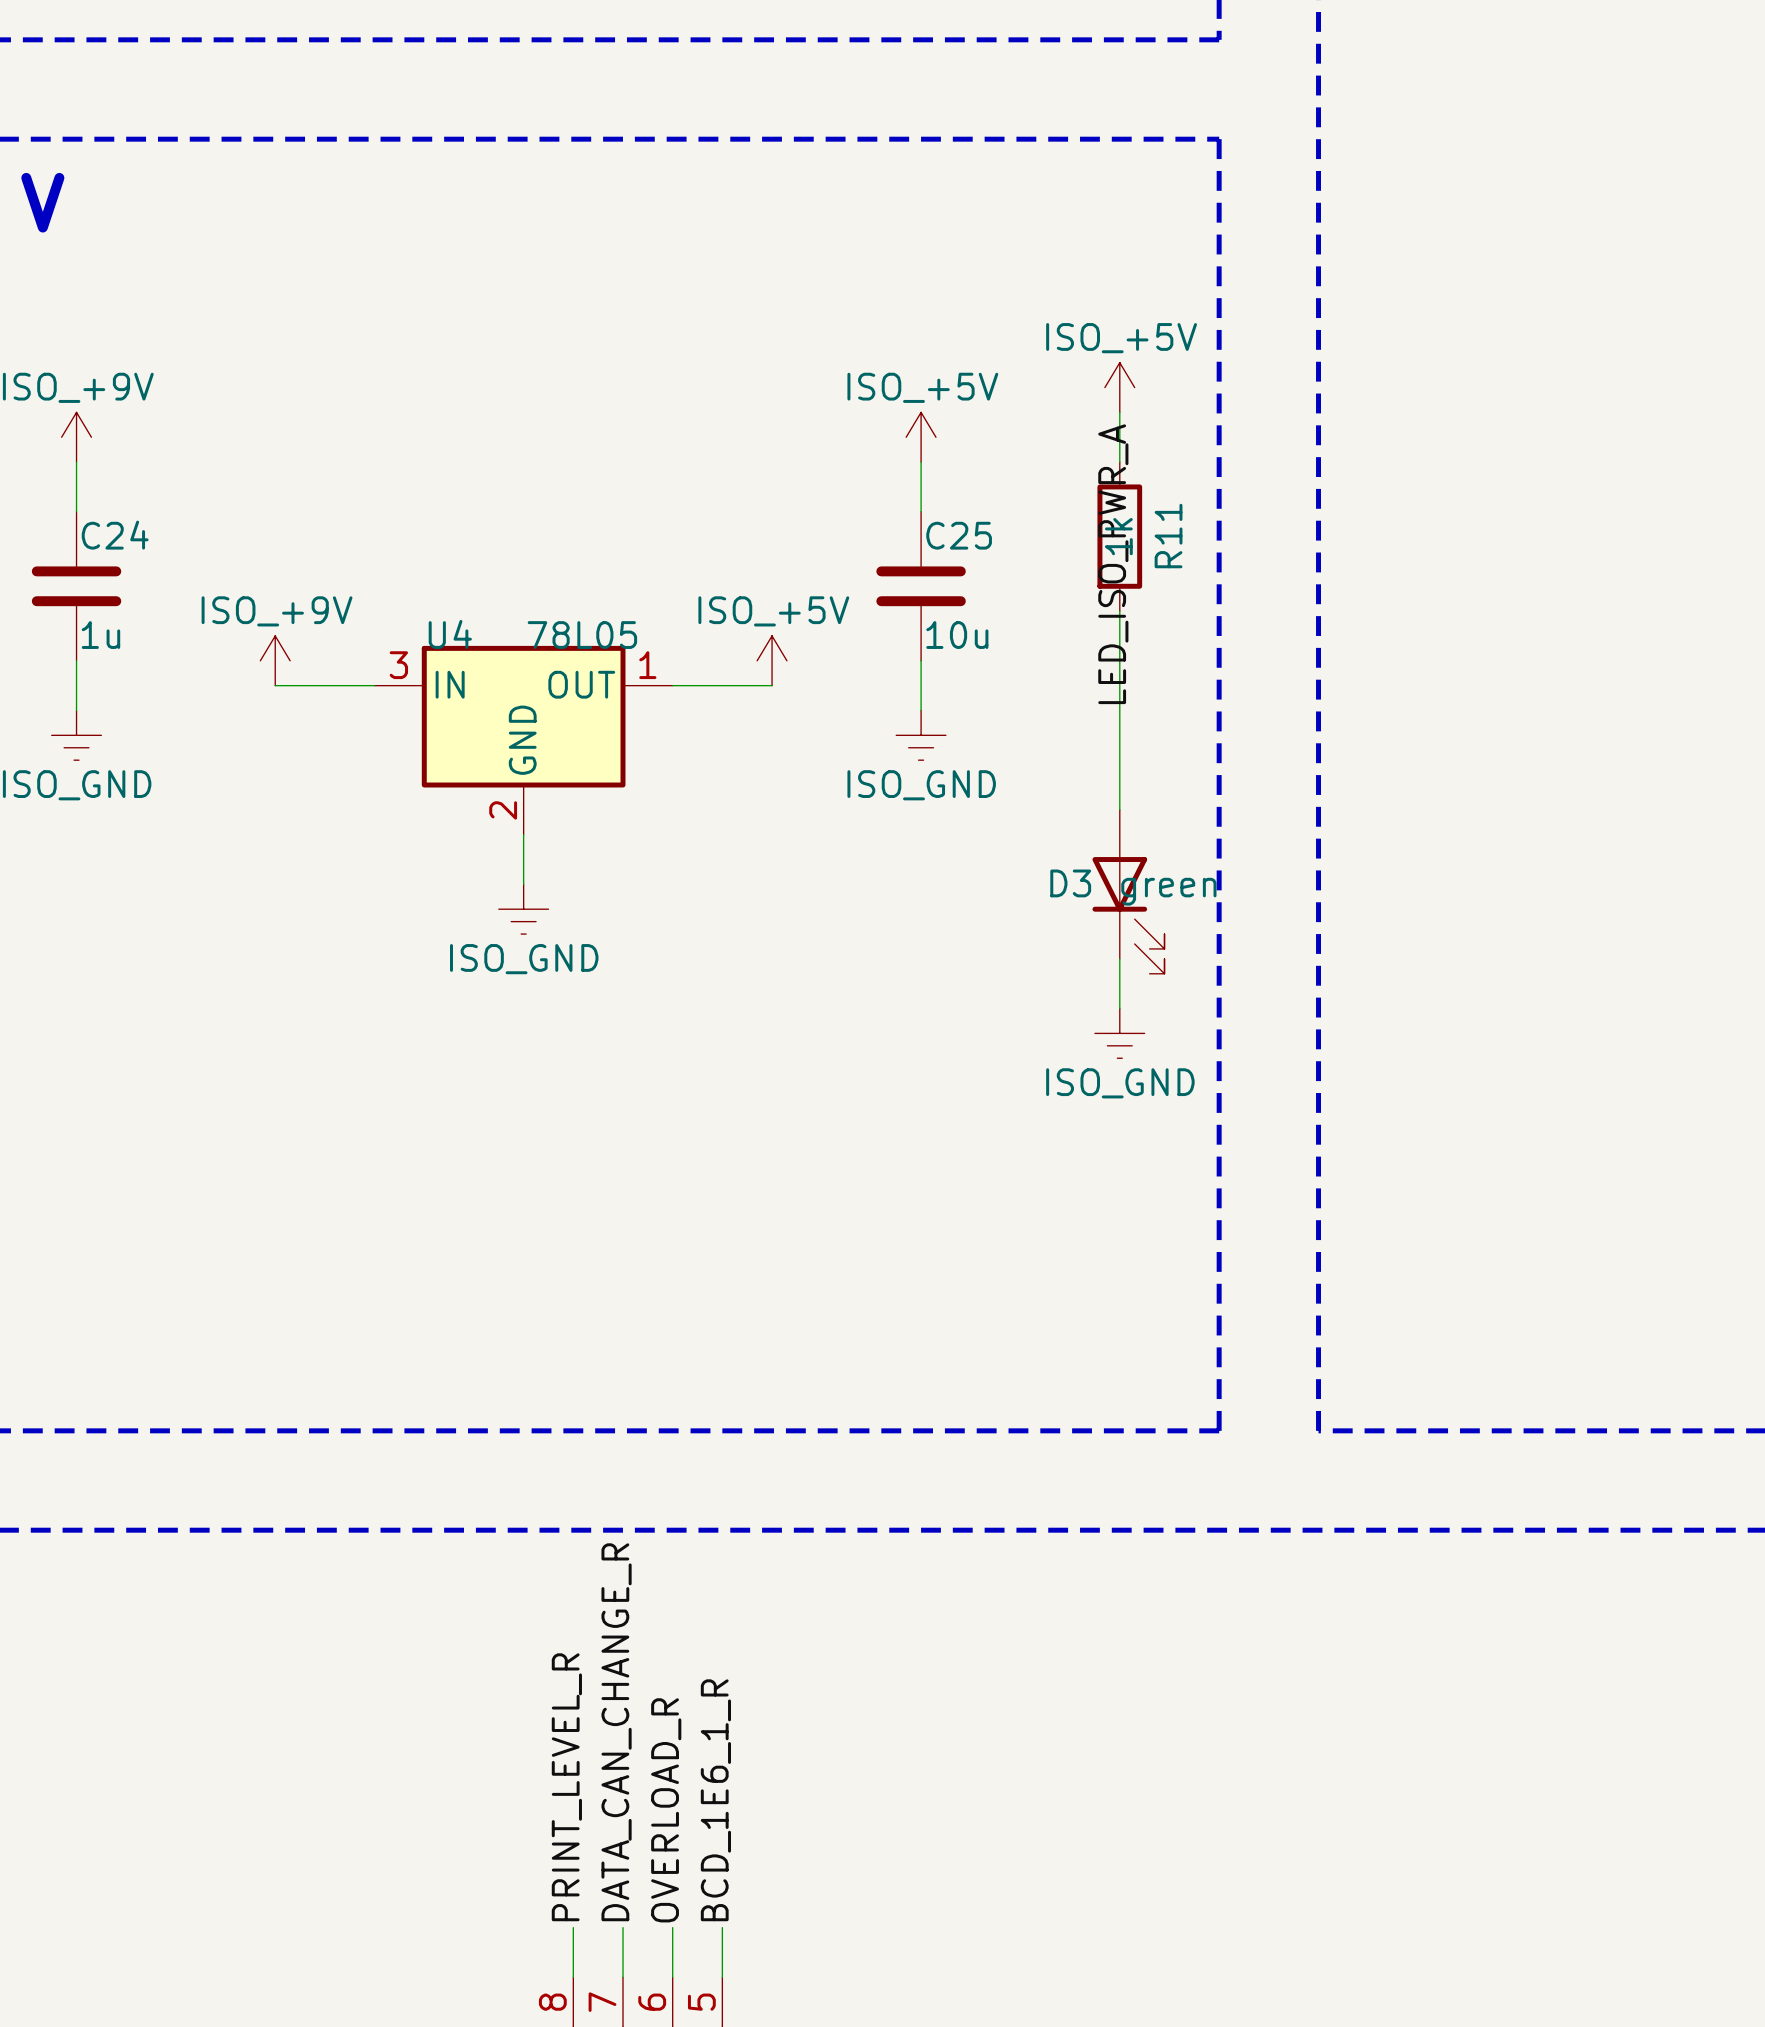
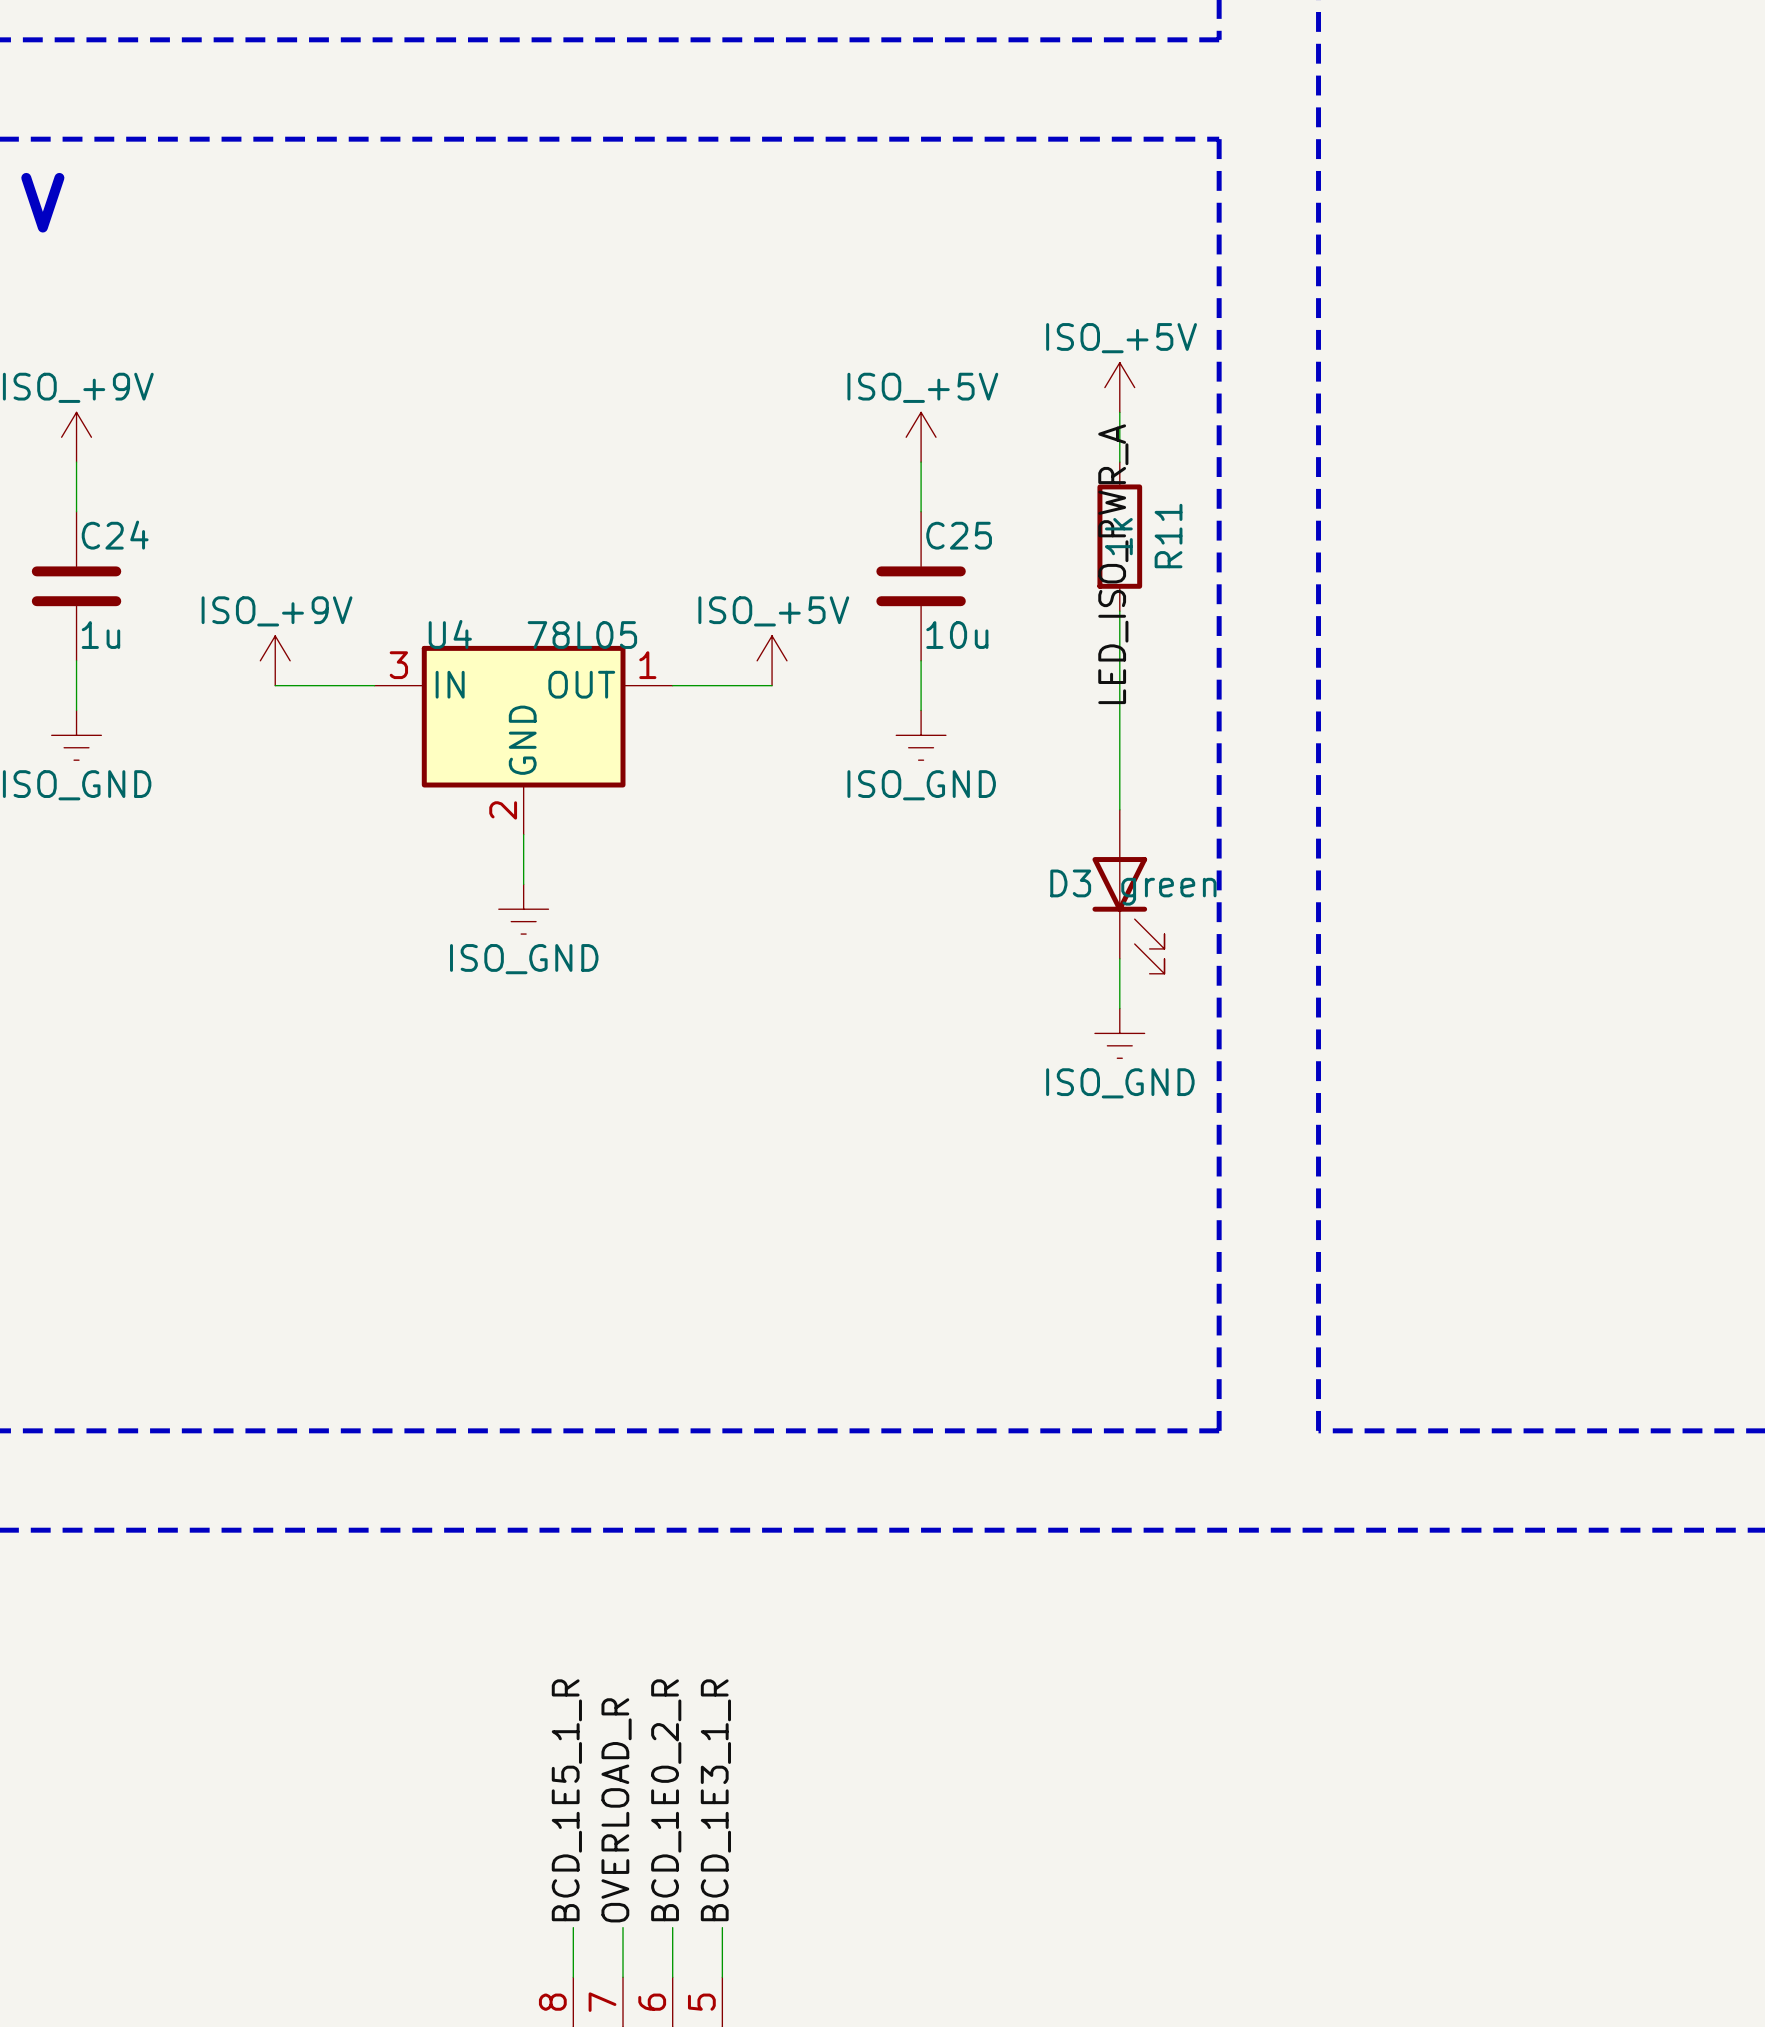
label: DATA_CAN_CHANGE_R (616, 1732) -> OVERLOAD_R (616, 1810)
label: PRINT_LEVEL_R (566, 1787) -> BCD_1E5_1_R (566, 1800)
label: BCD_1E6_1_R (715, 1800) -> BCD_1E3_1_R (715, 1800)
label: OVERLOAD_R (666, 1810) -> BCD_1E0_2_R (666, 1800)

